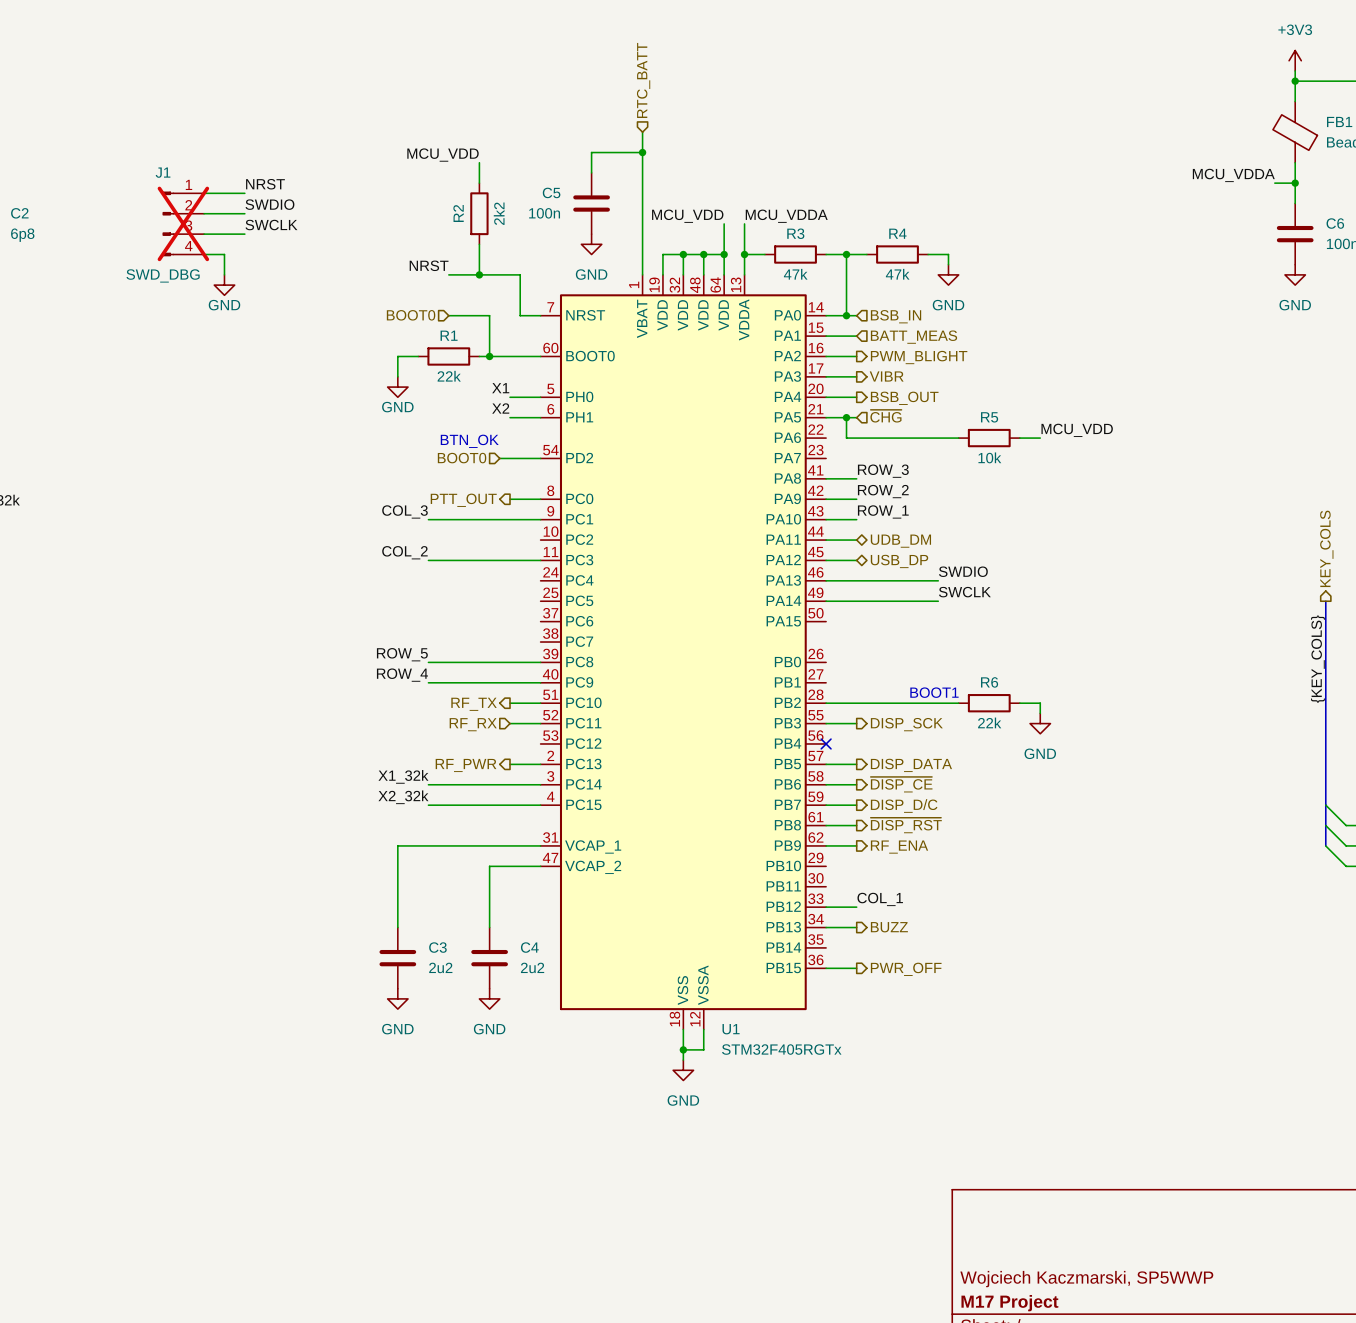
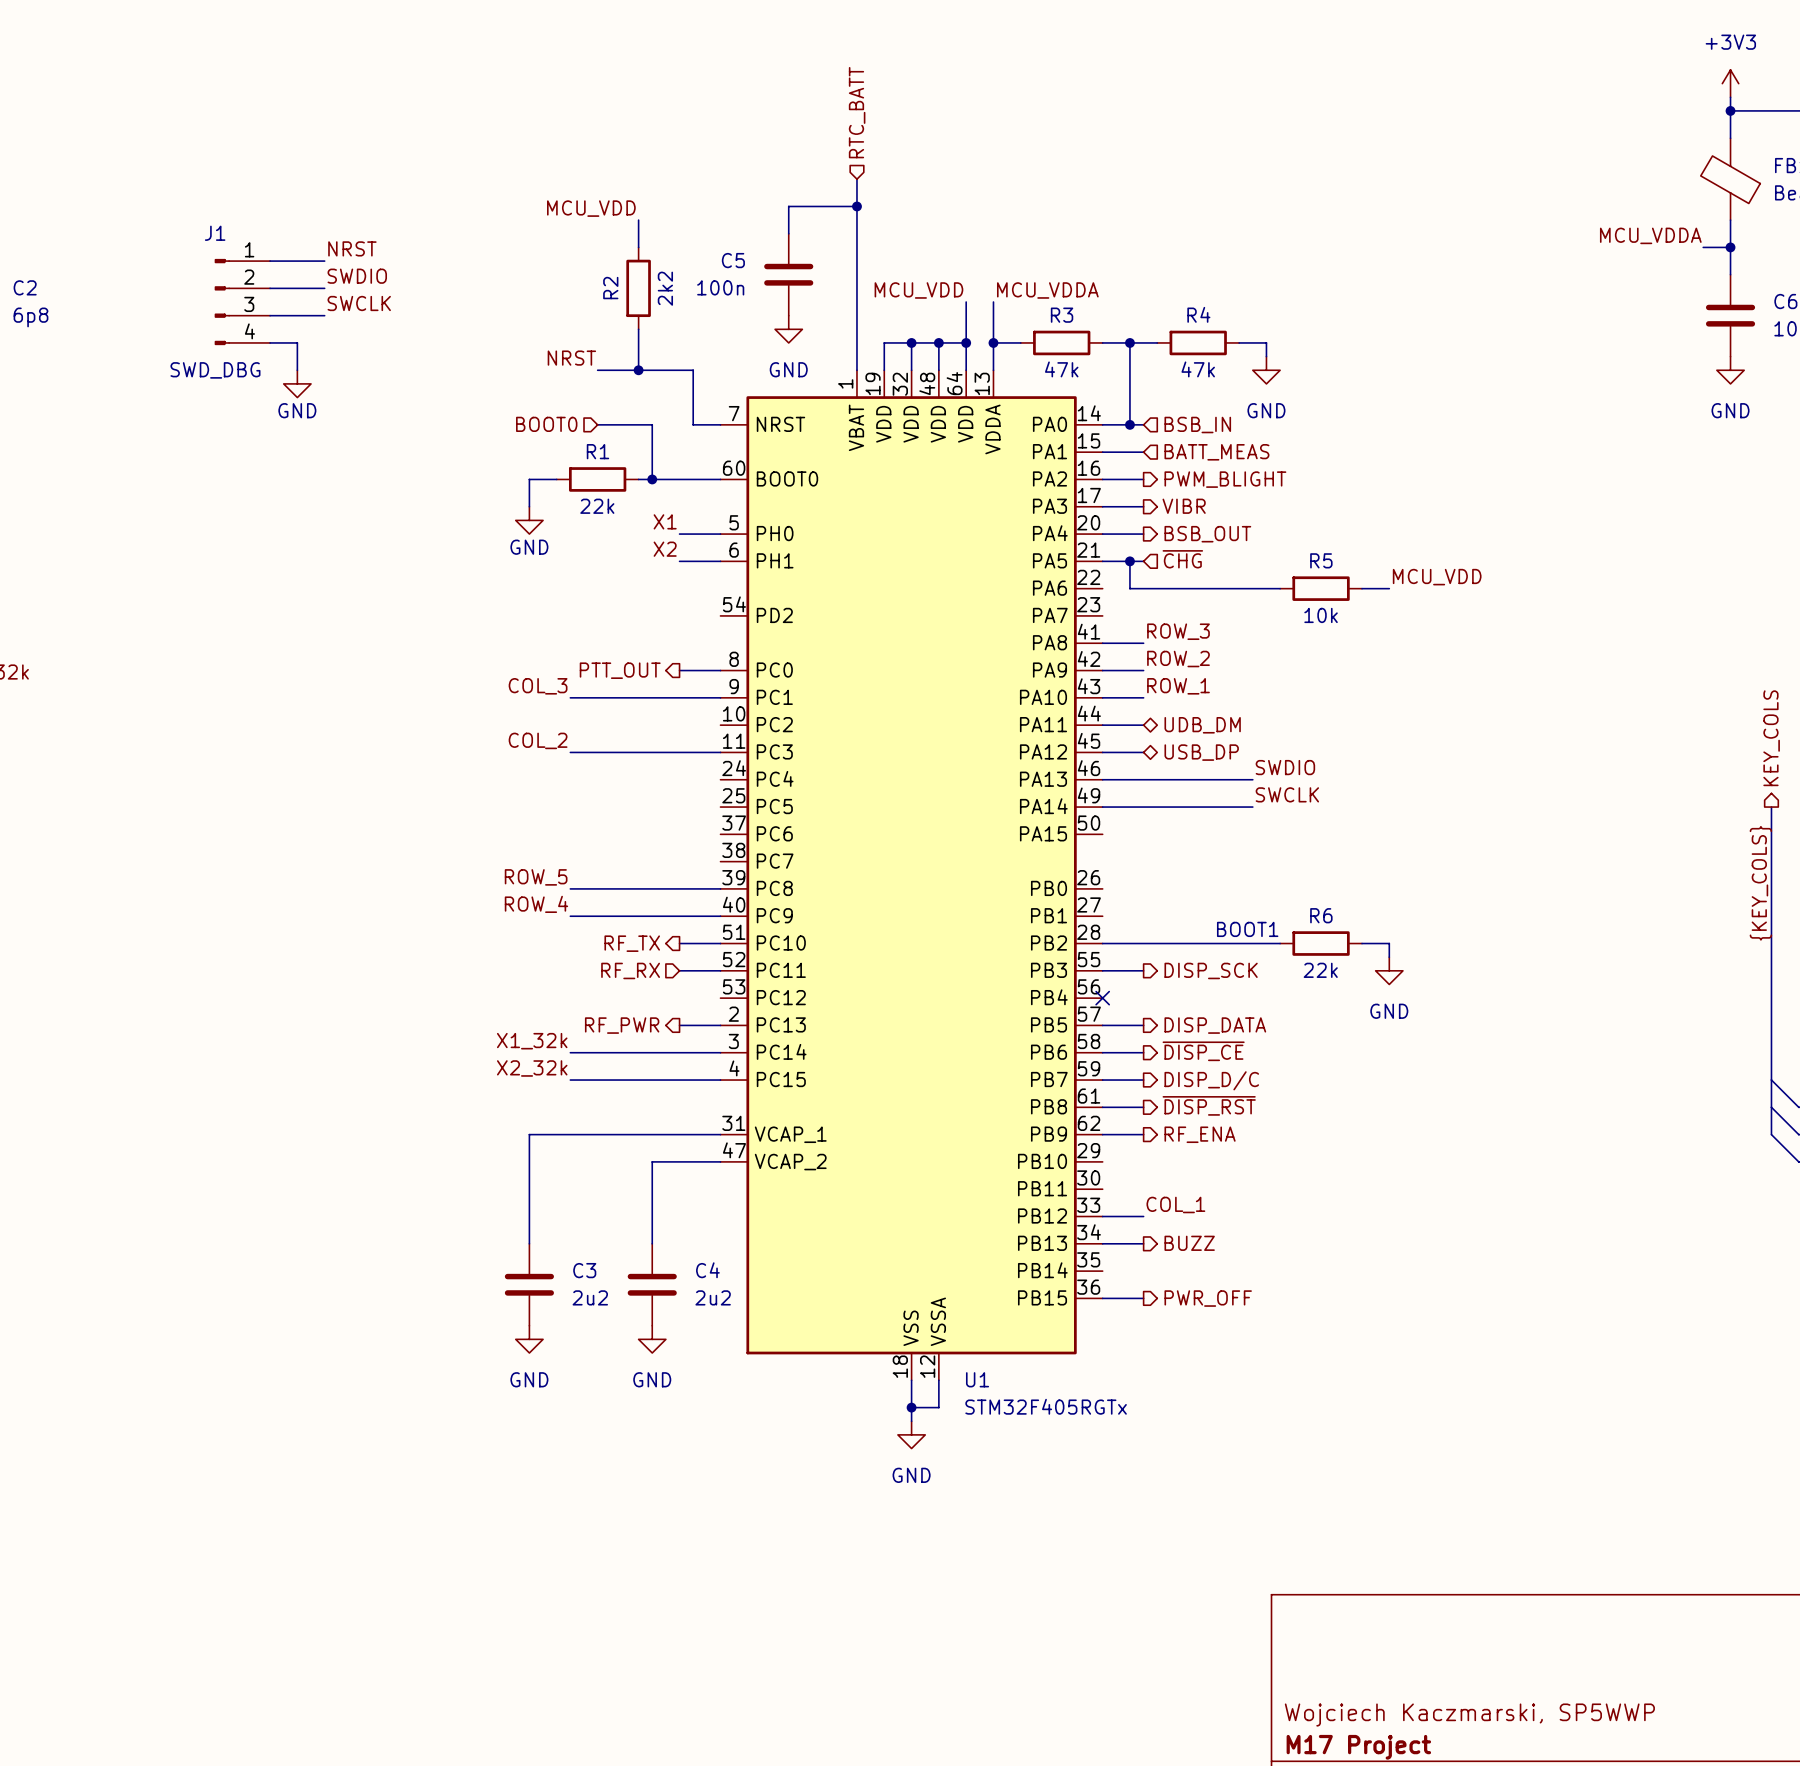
J1 do-not-place cross: (183, 223) -> none
text: BTN_OK (469, 441) -> none
hierarchical label: BOOT0 (462, 458) -> none
wire: (499, 458) (540, 458) -> none

